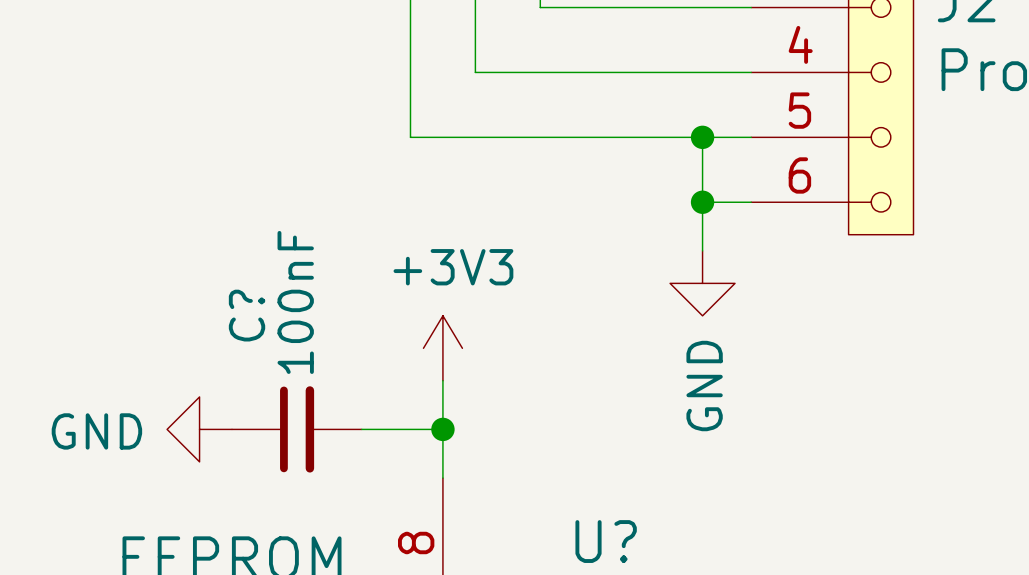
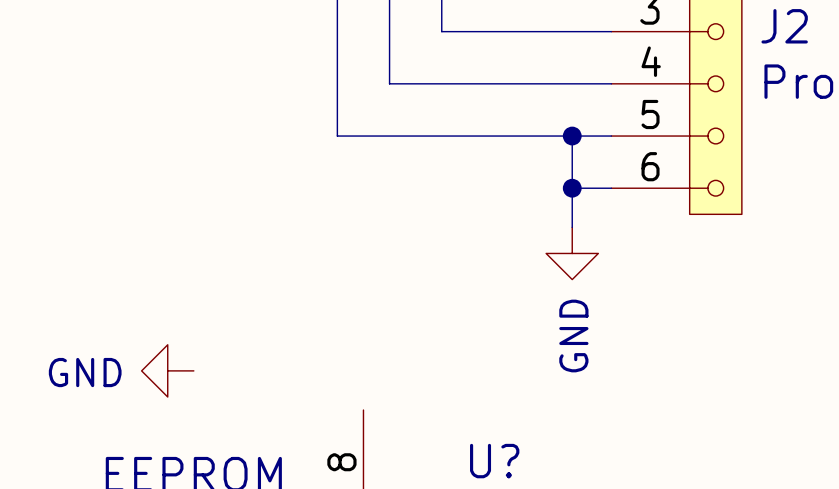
power symbol: +3V3 (442, 348) -> none
wire: (442, 380) (442, 478) -> none
C?: 100nF (296, 429) -> none
wire: (361, 429) (442, 429) -> none
junction: (442, 429) -> none

